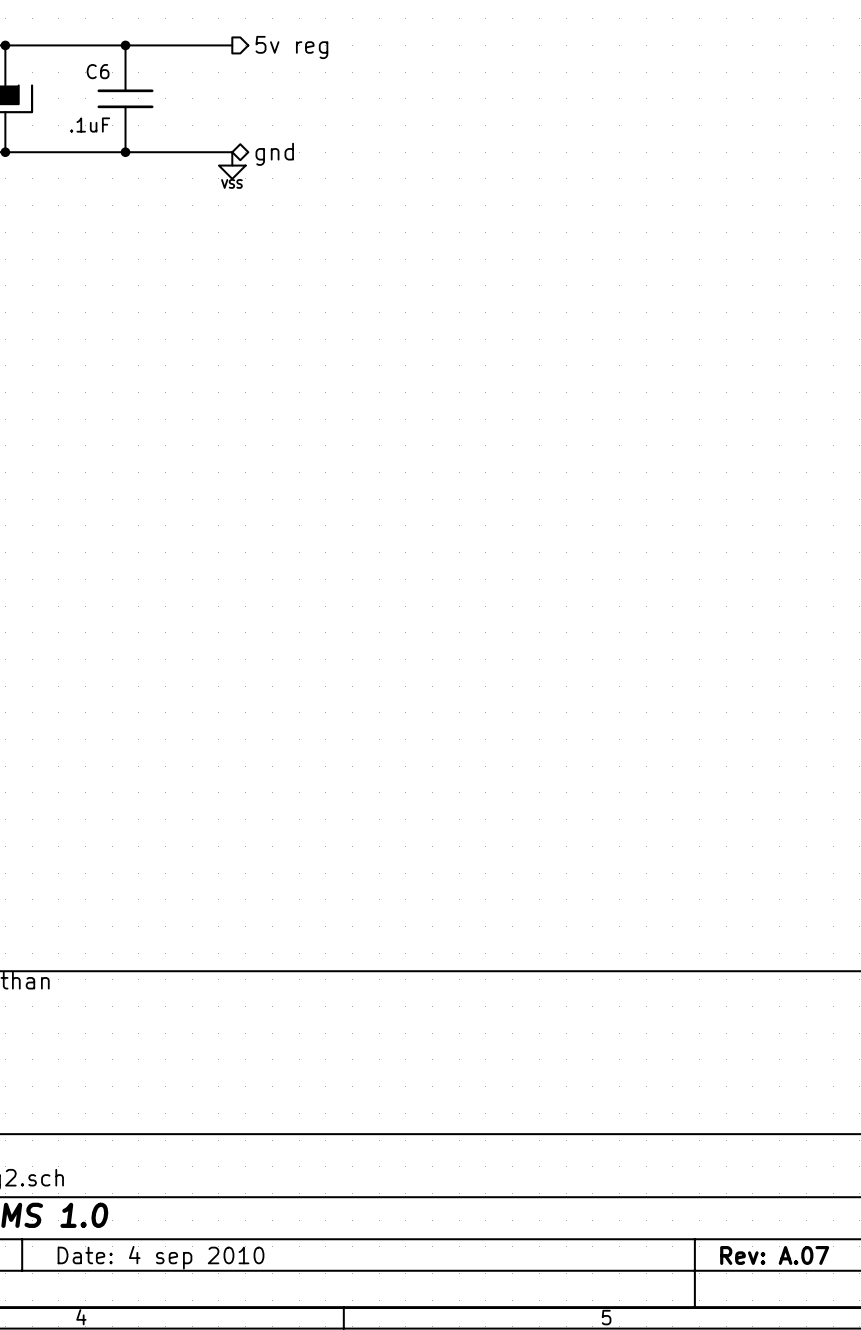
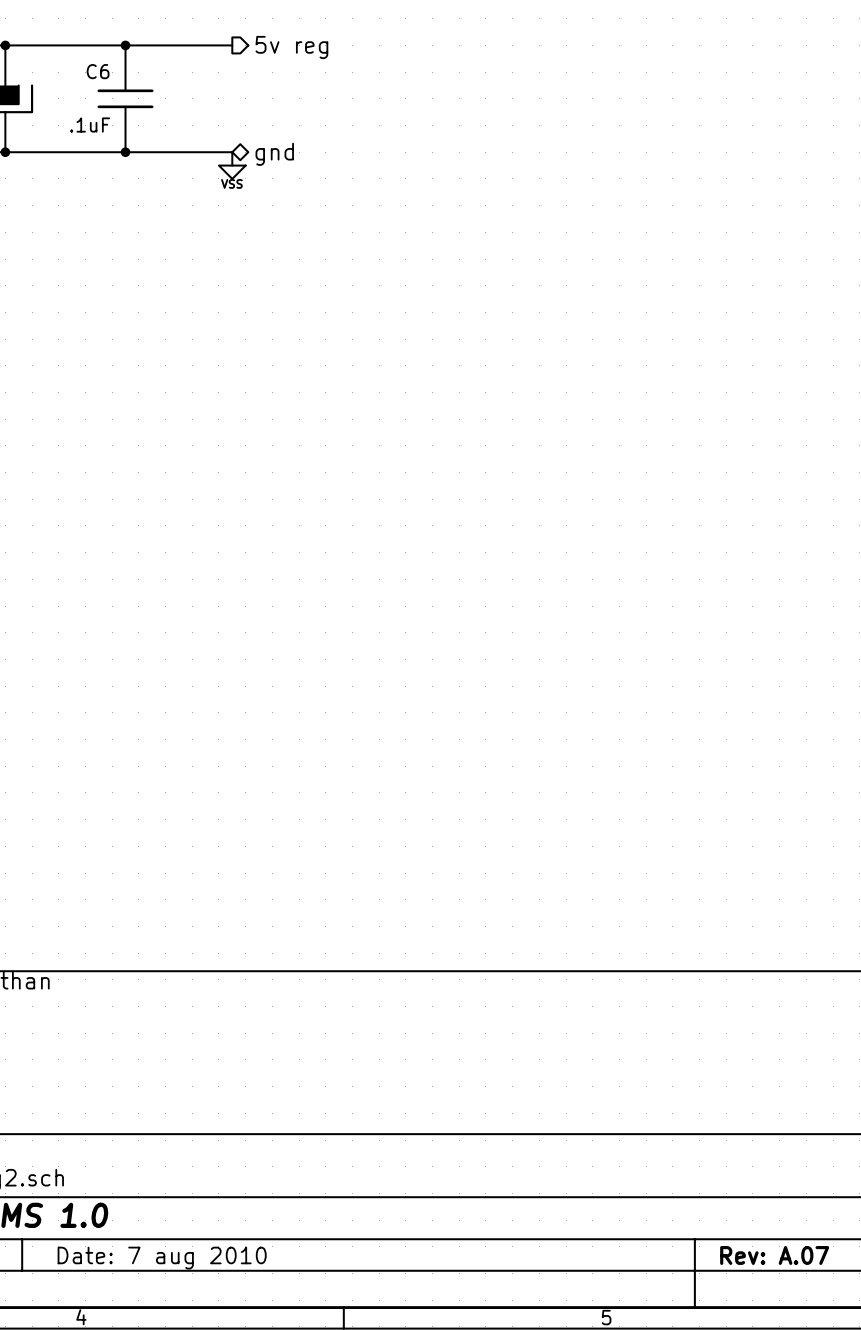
title block: Date: 4 sep 2010 (161, 1257) -> Date: 7 aug 2010 (162, 1258)

